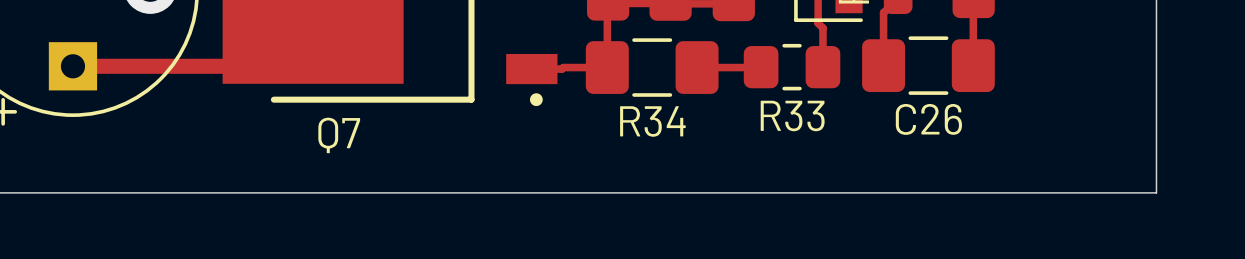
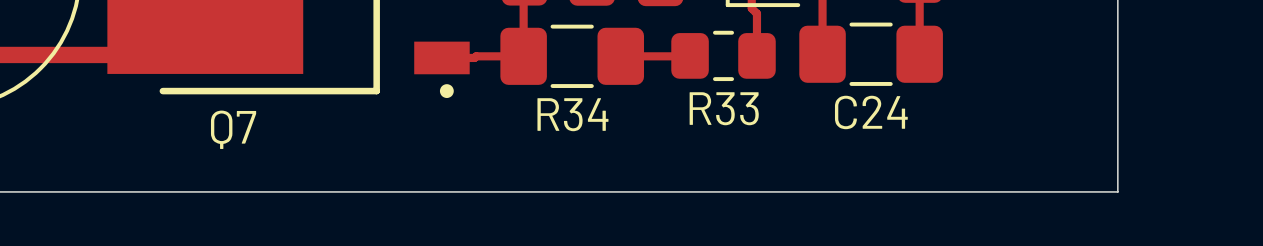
C26 name: C26 (928, 119) -> C24 (871, 112)

